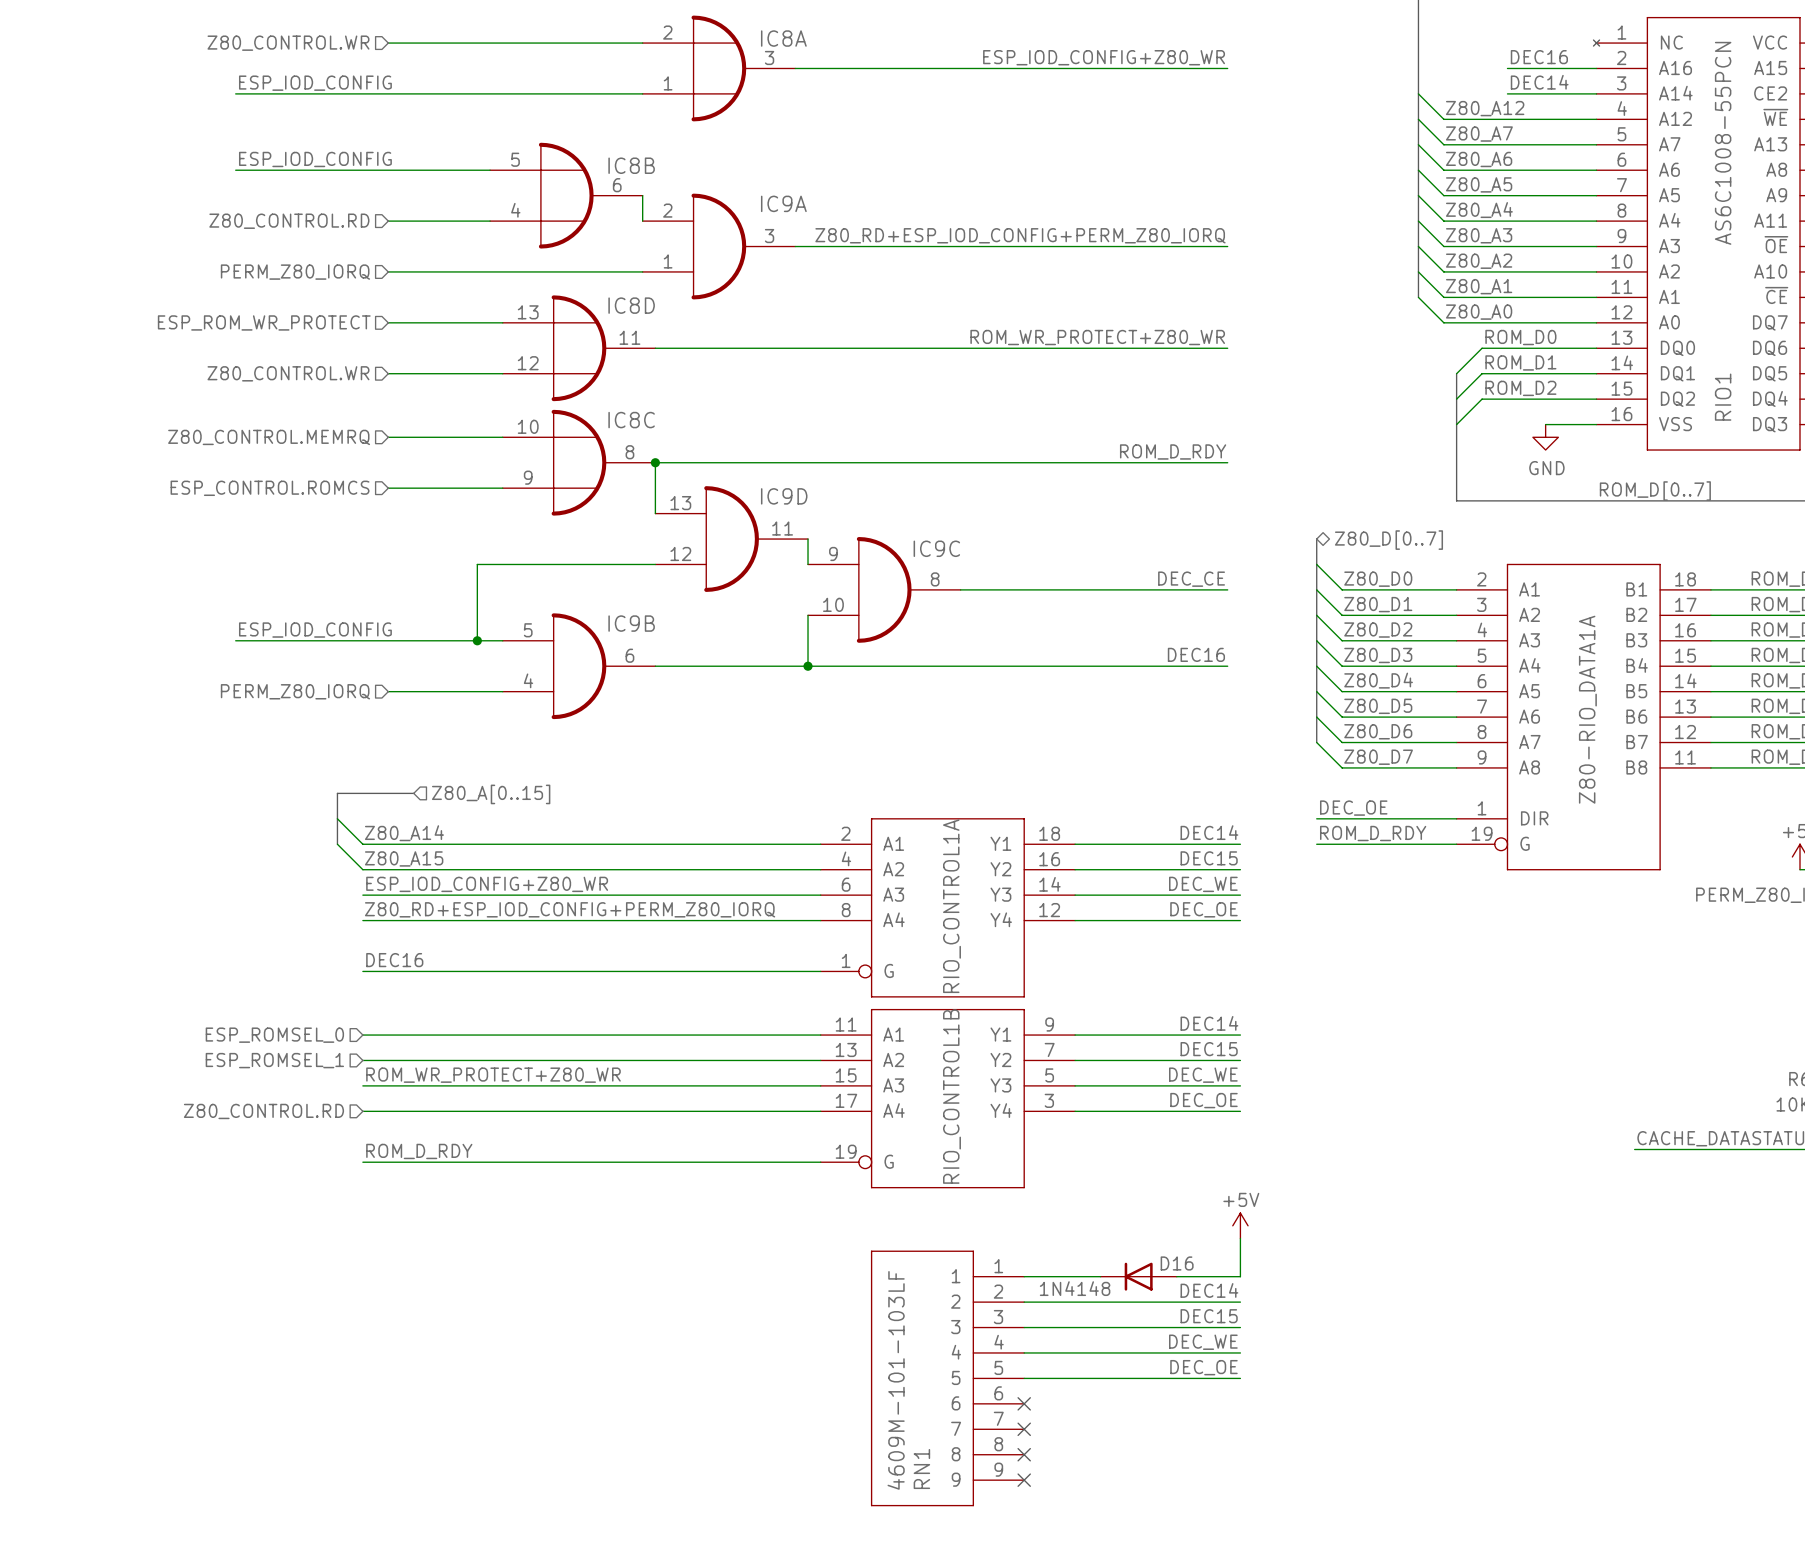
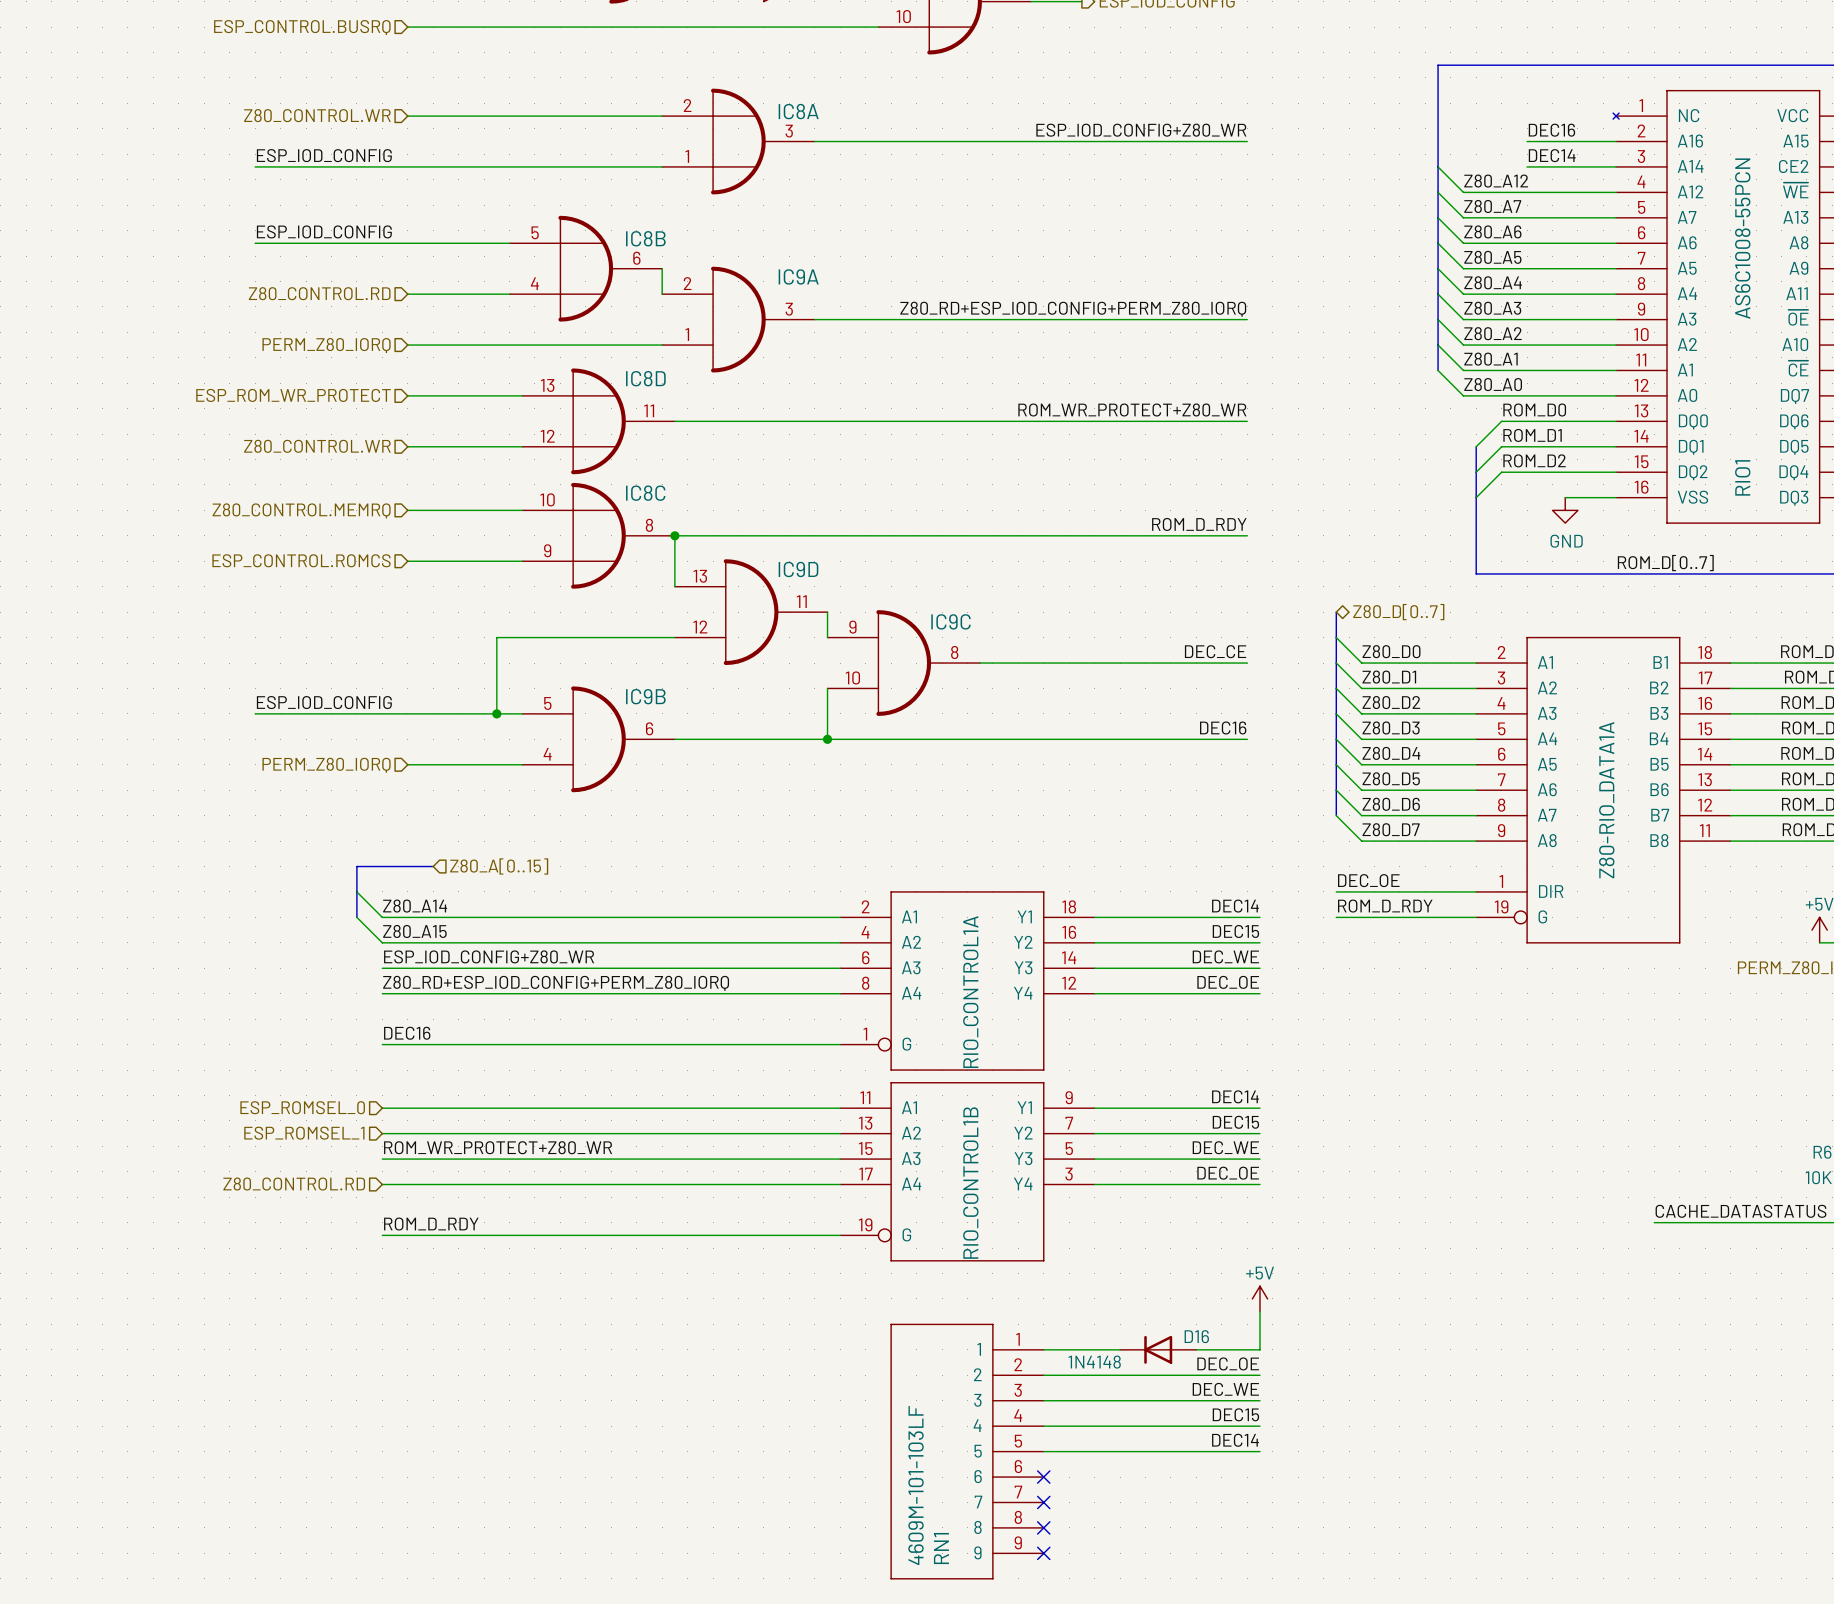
label: DEC14 (1209, 1290) -> DEC_OE (1228, 1363)
label: DEC15 (1209, 1316) -> DEC_WE (1225, 1389)
label: DEC_WE (1203, 1342) -> DEC15 (1235, 1414)
label: DEC_OE (1203, 1367) -> DEC14 (1235, 1440)

